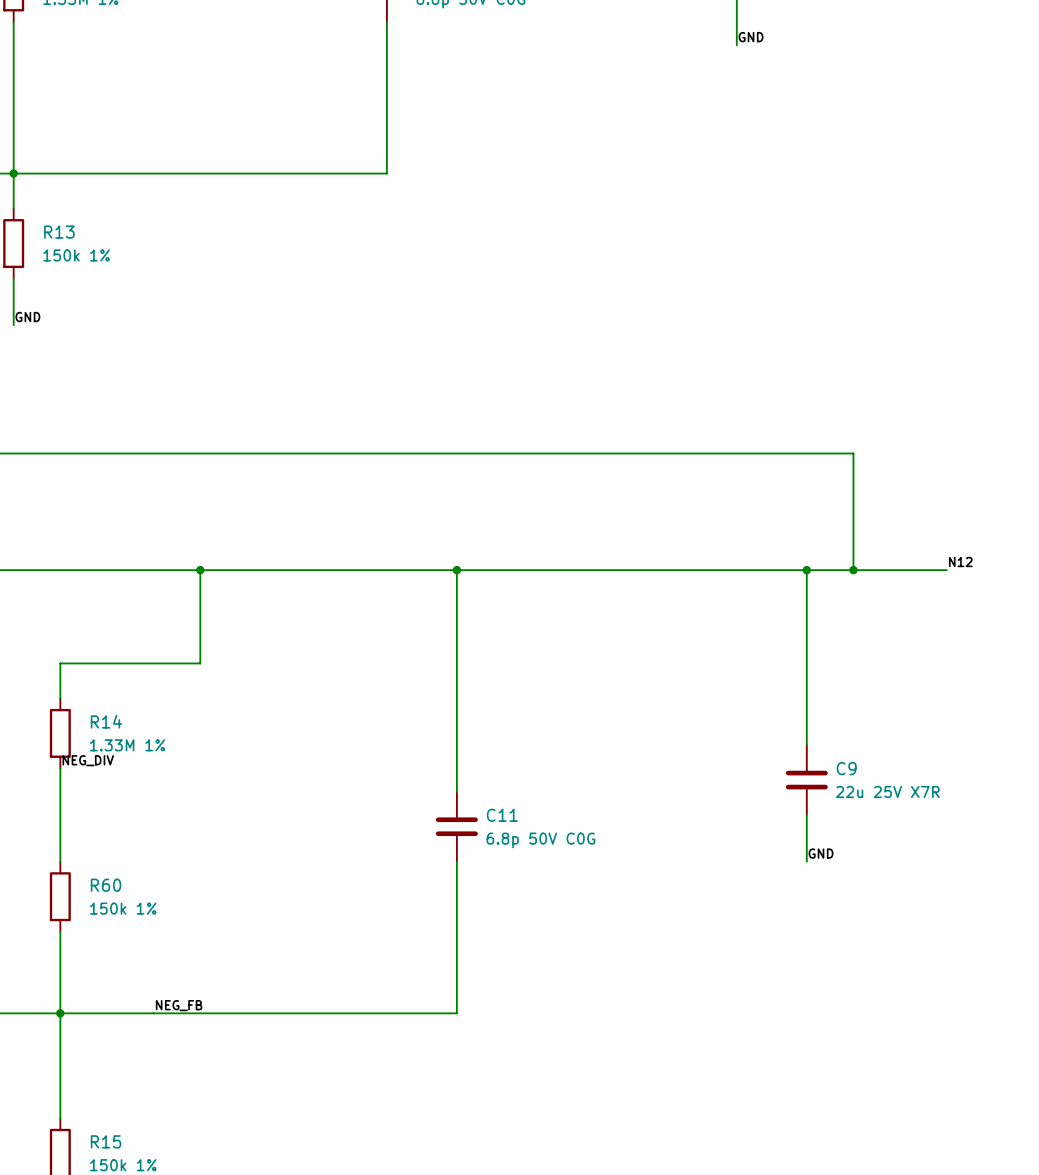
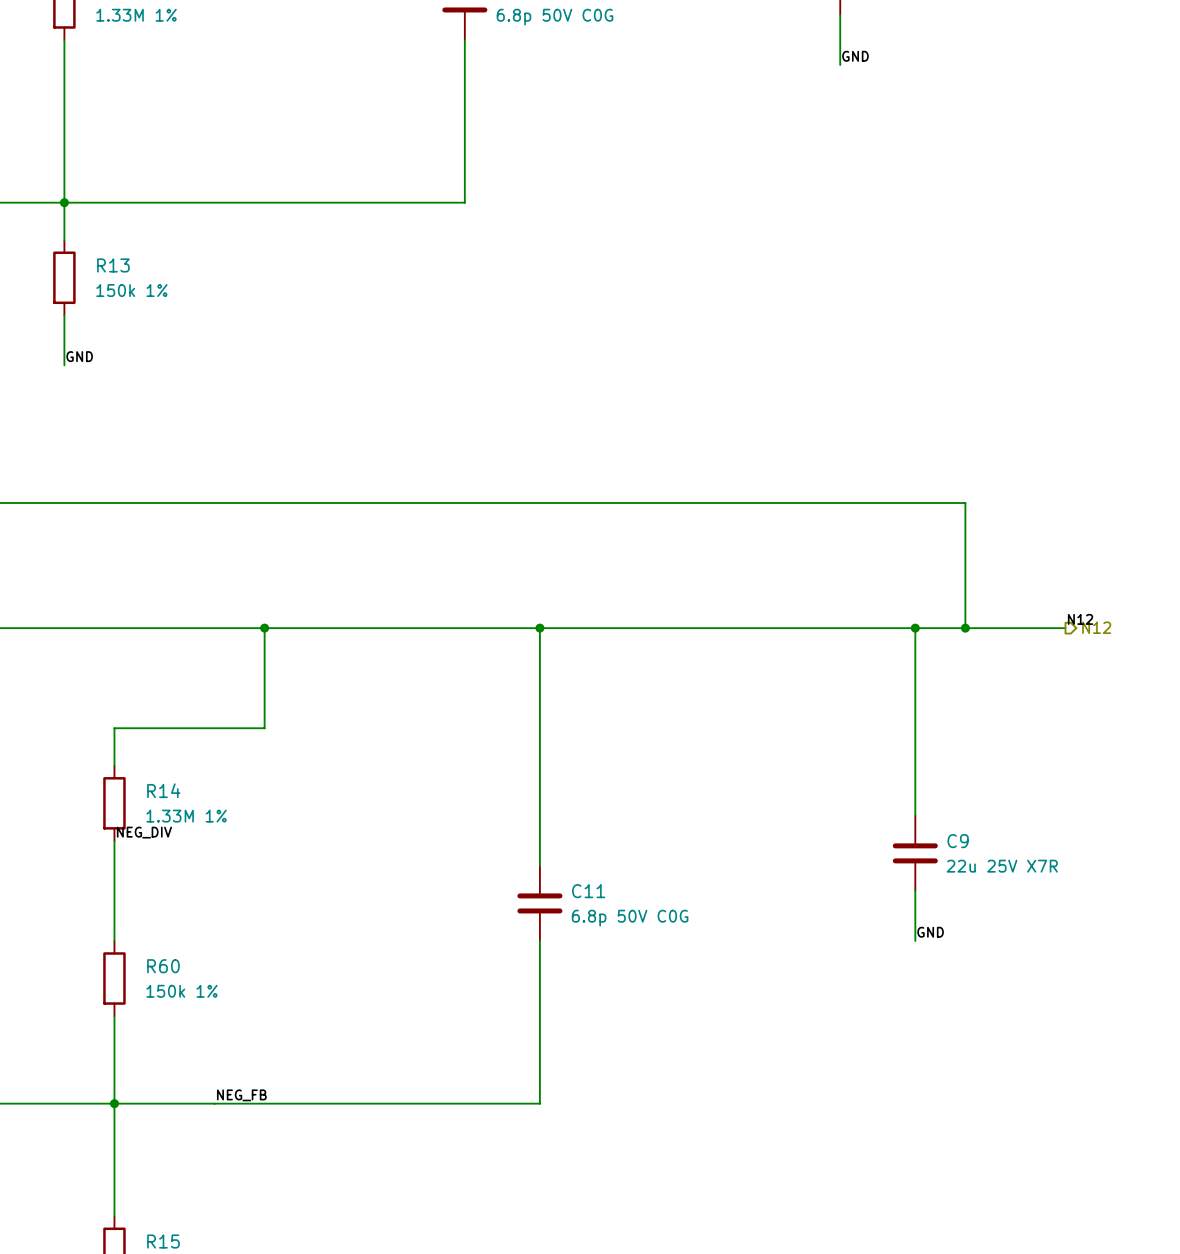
hierarchical label: none -> N12 (1096, 627)

